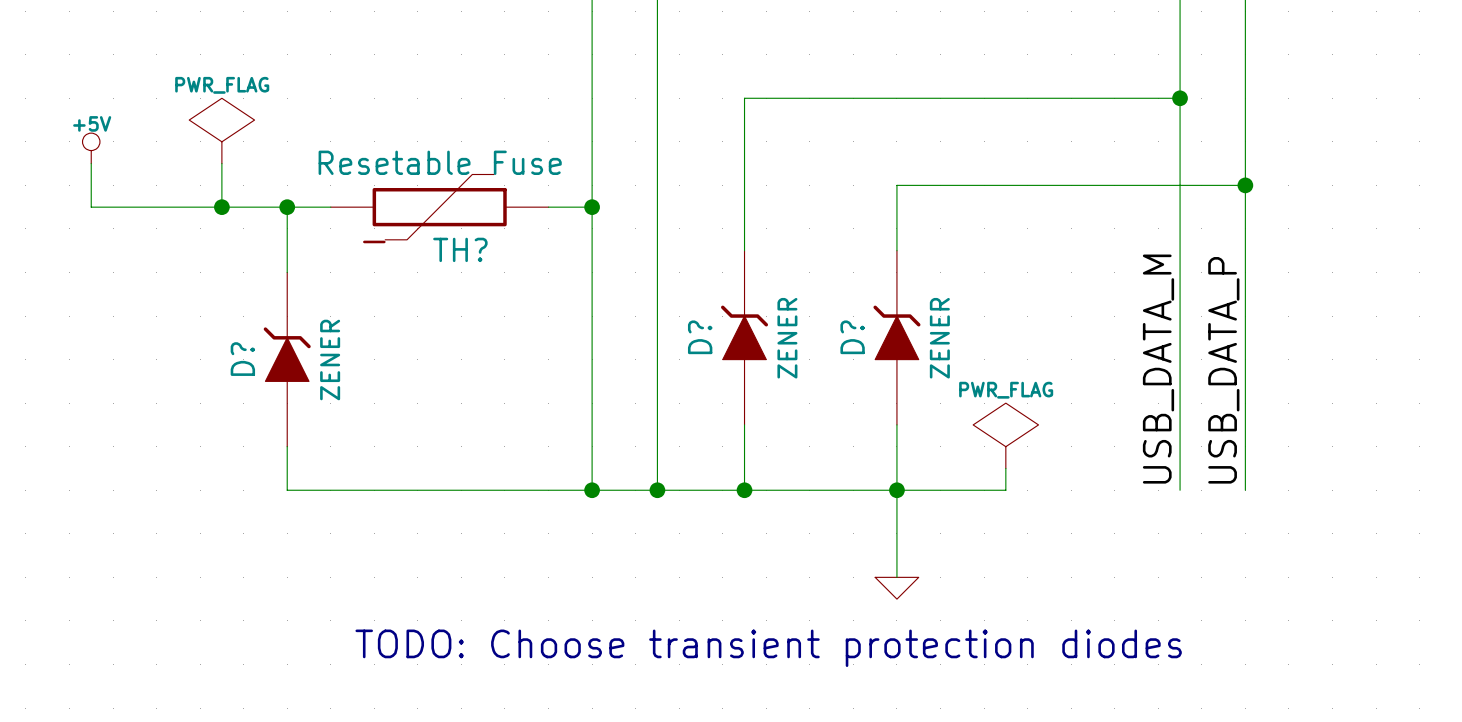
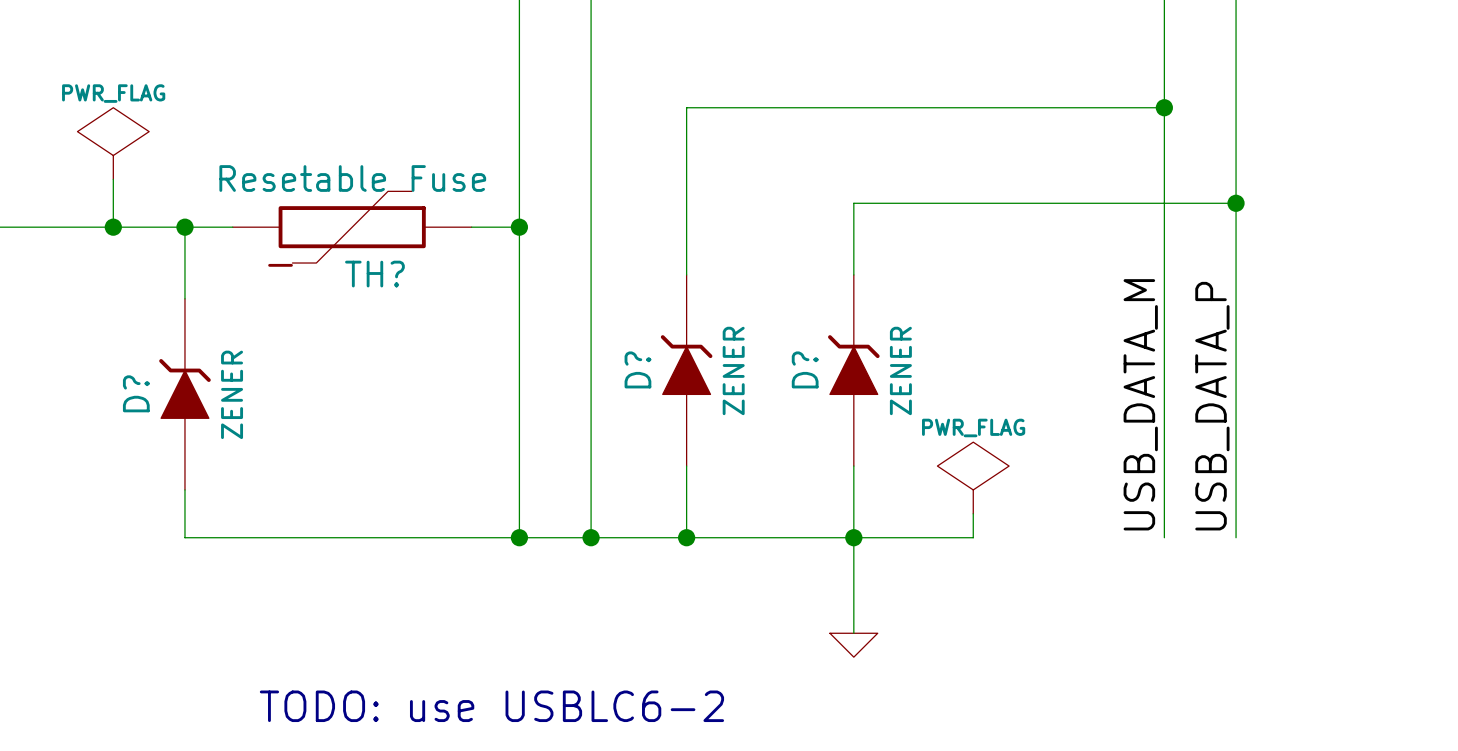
text: TODO: Choose transient protection diodes (768, 648) -> TODO: use USBLC6-2 (491, 706)

